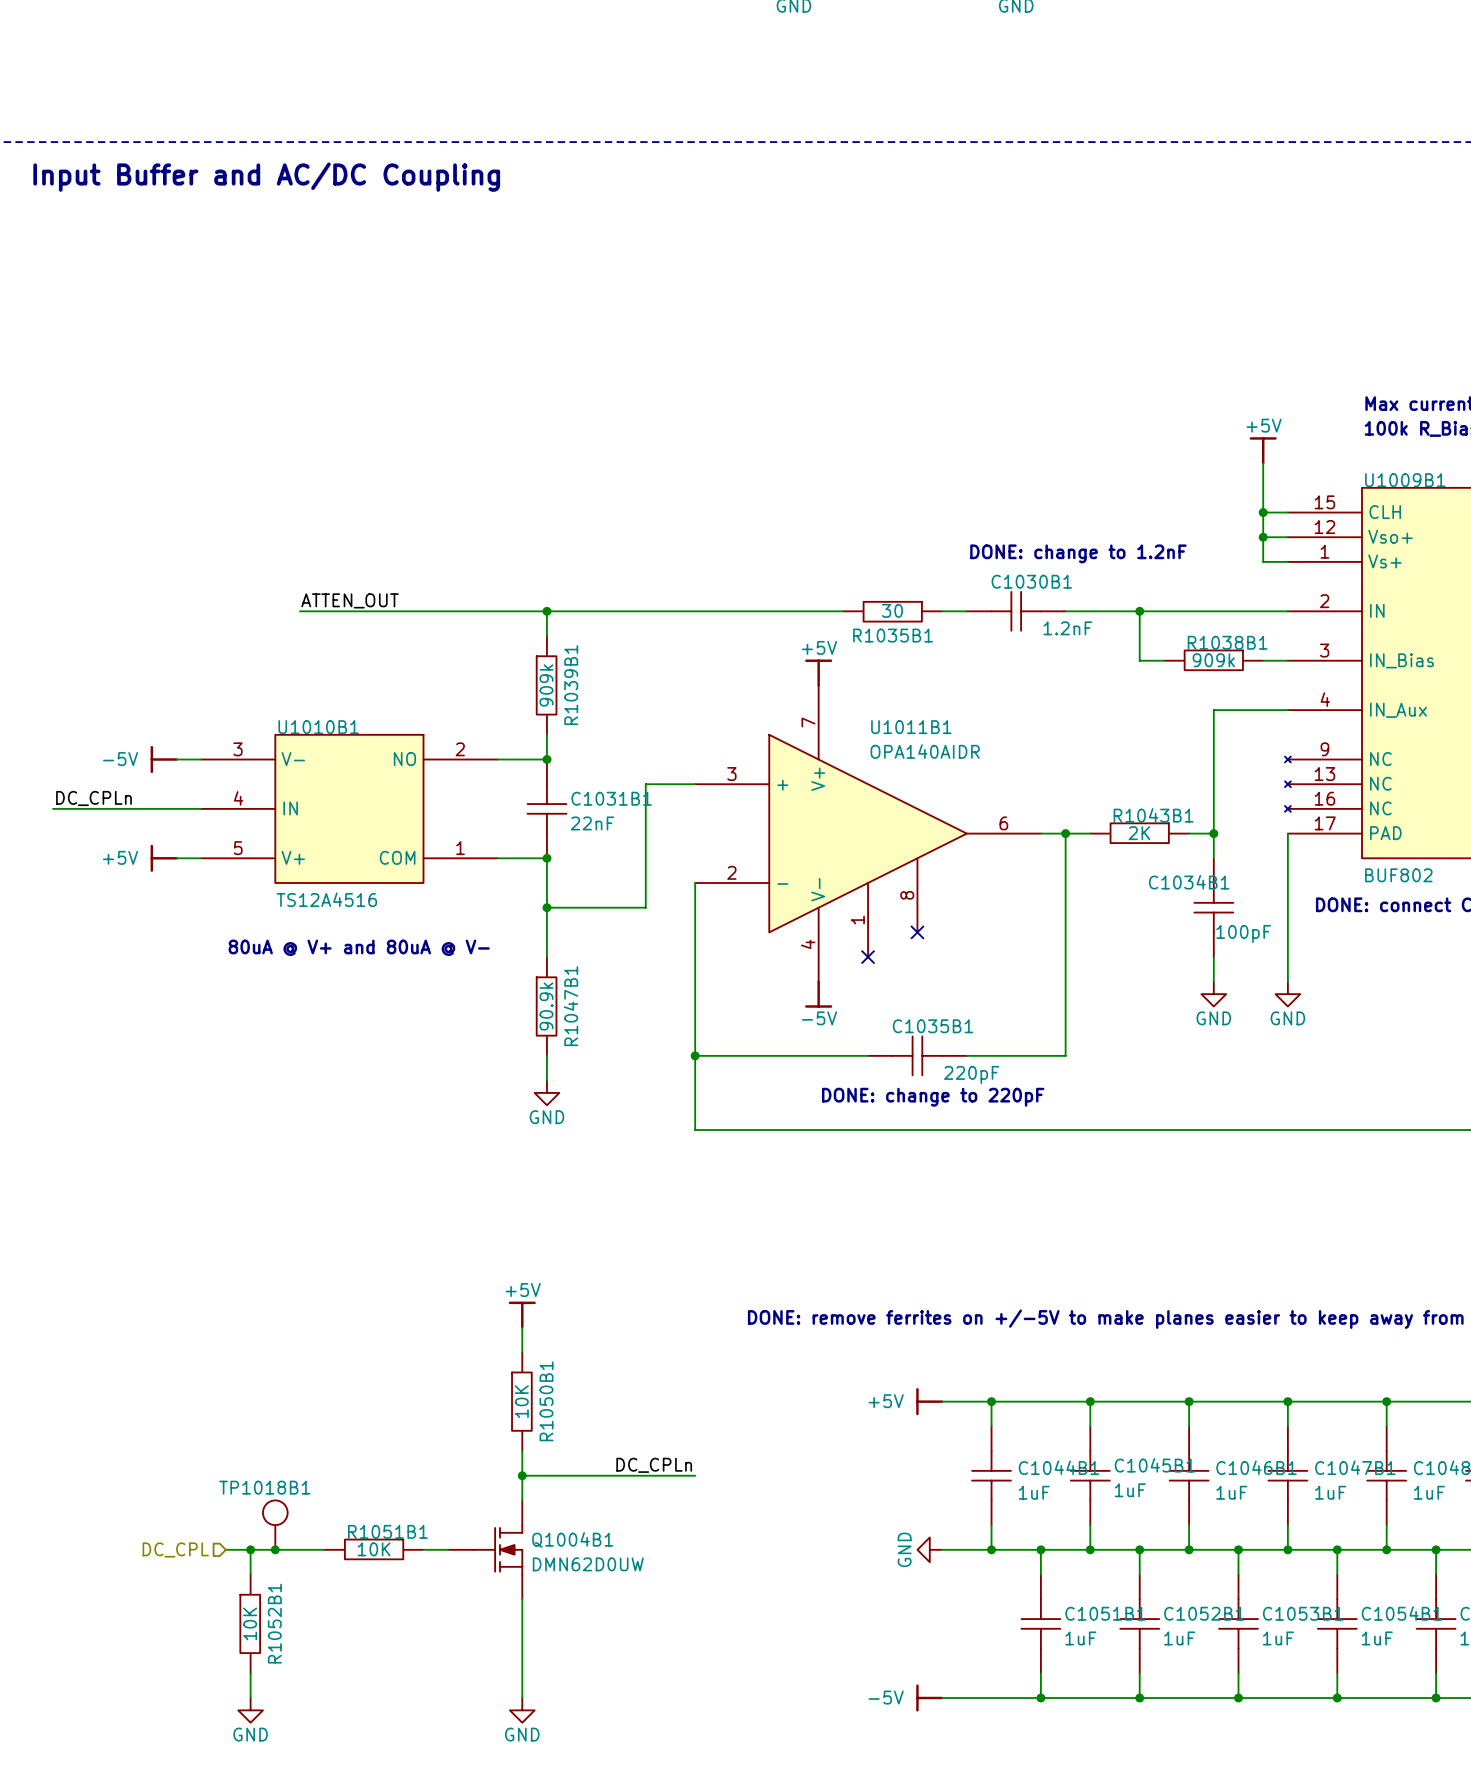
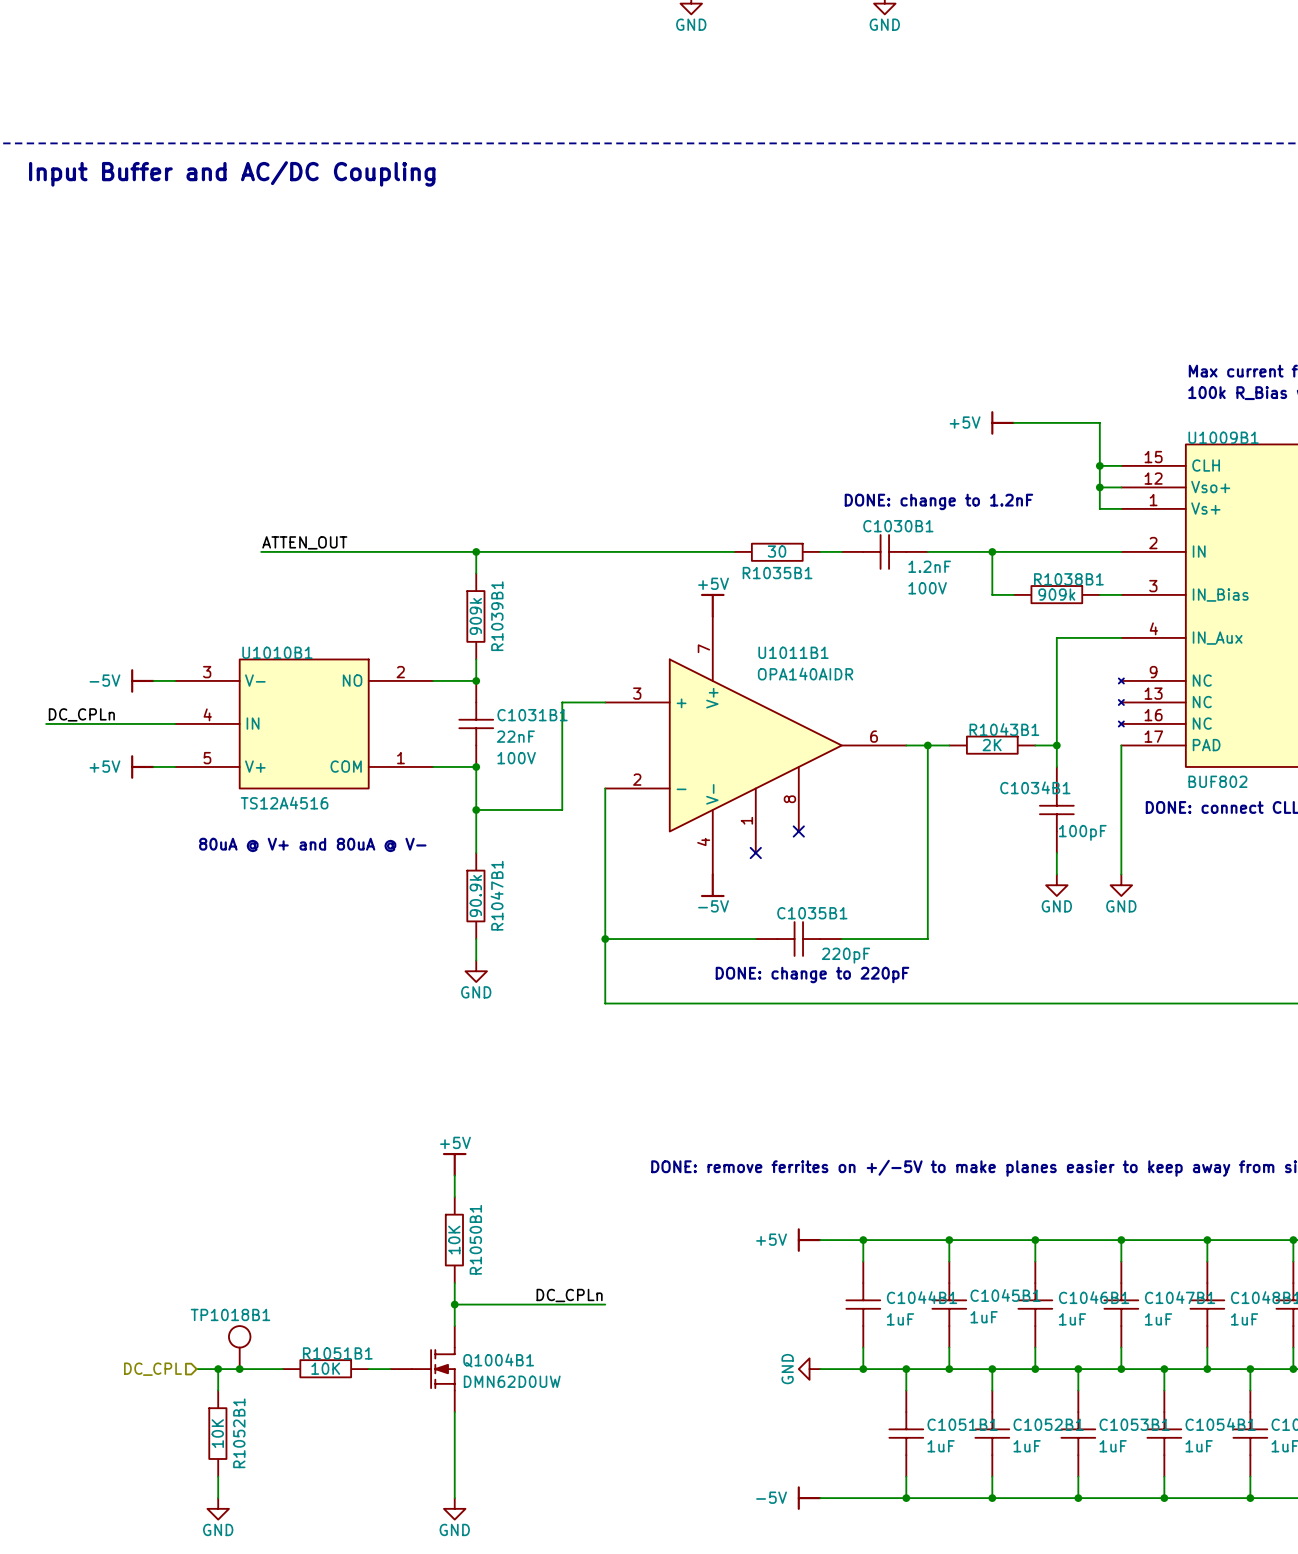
power symbol text position: +5V (1264, 425) -> +5V (965, 422)
power symbol rotation: 0° (1263, 450) -> 90° counterclockwise (1003, 422)
power symbol position: +5V (1263, 450) -> +5V (1003, 422)
wire: none -> (1013, 422) (1099, 422)
C1030B1 text: none -> 100V (927, 588)
C1031B1 text: none -> 100V (516, 758)

